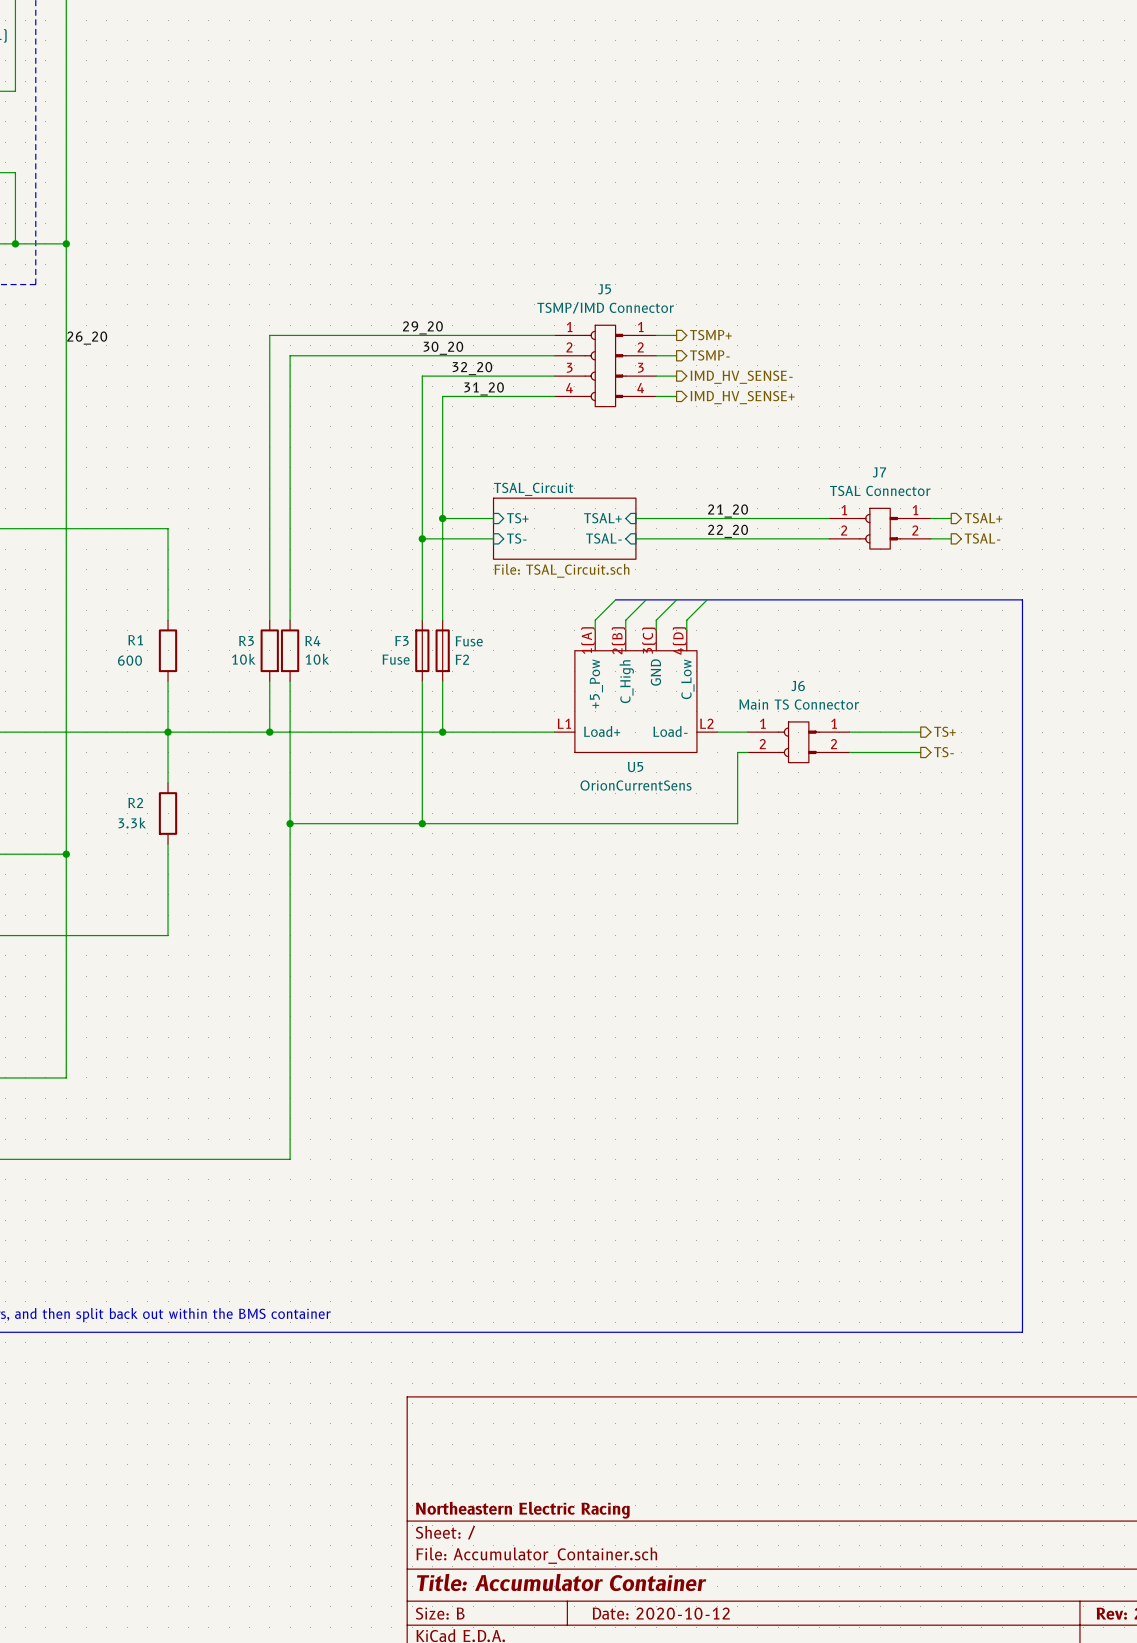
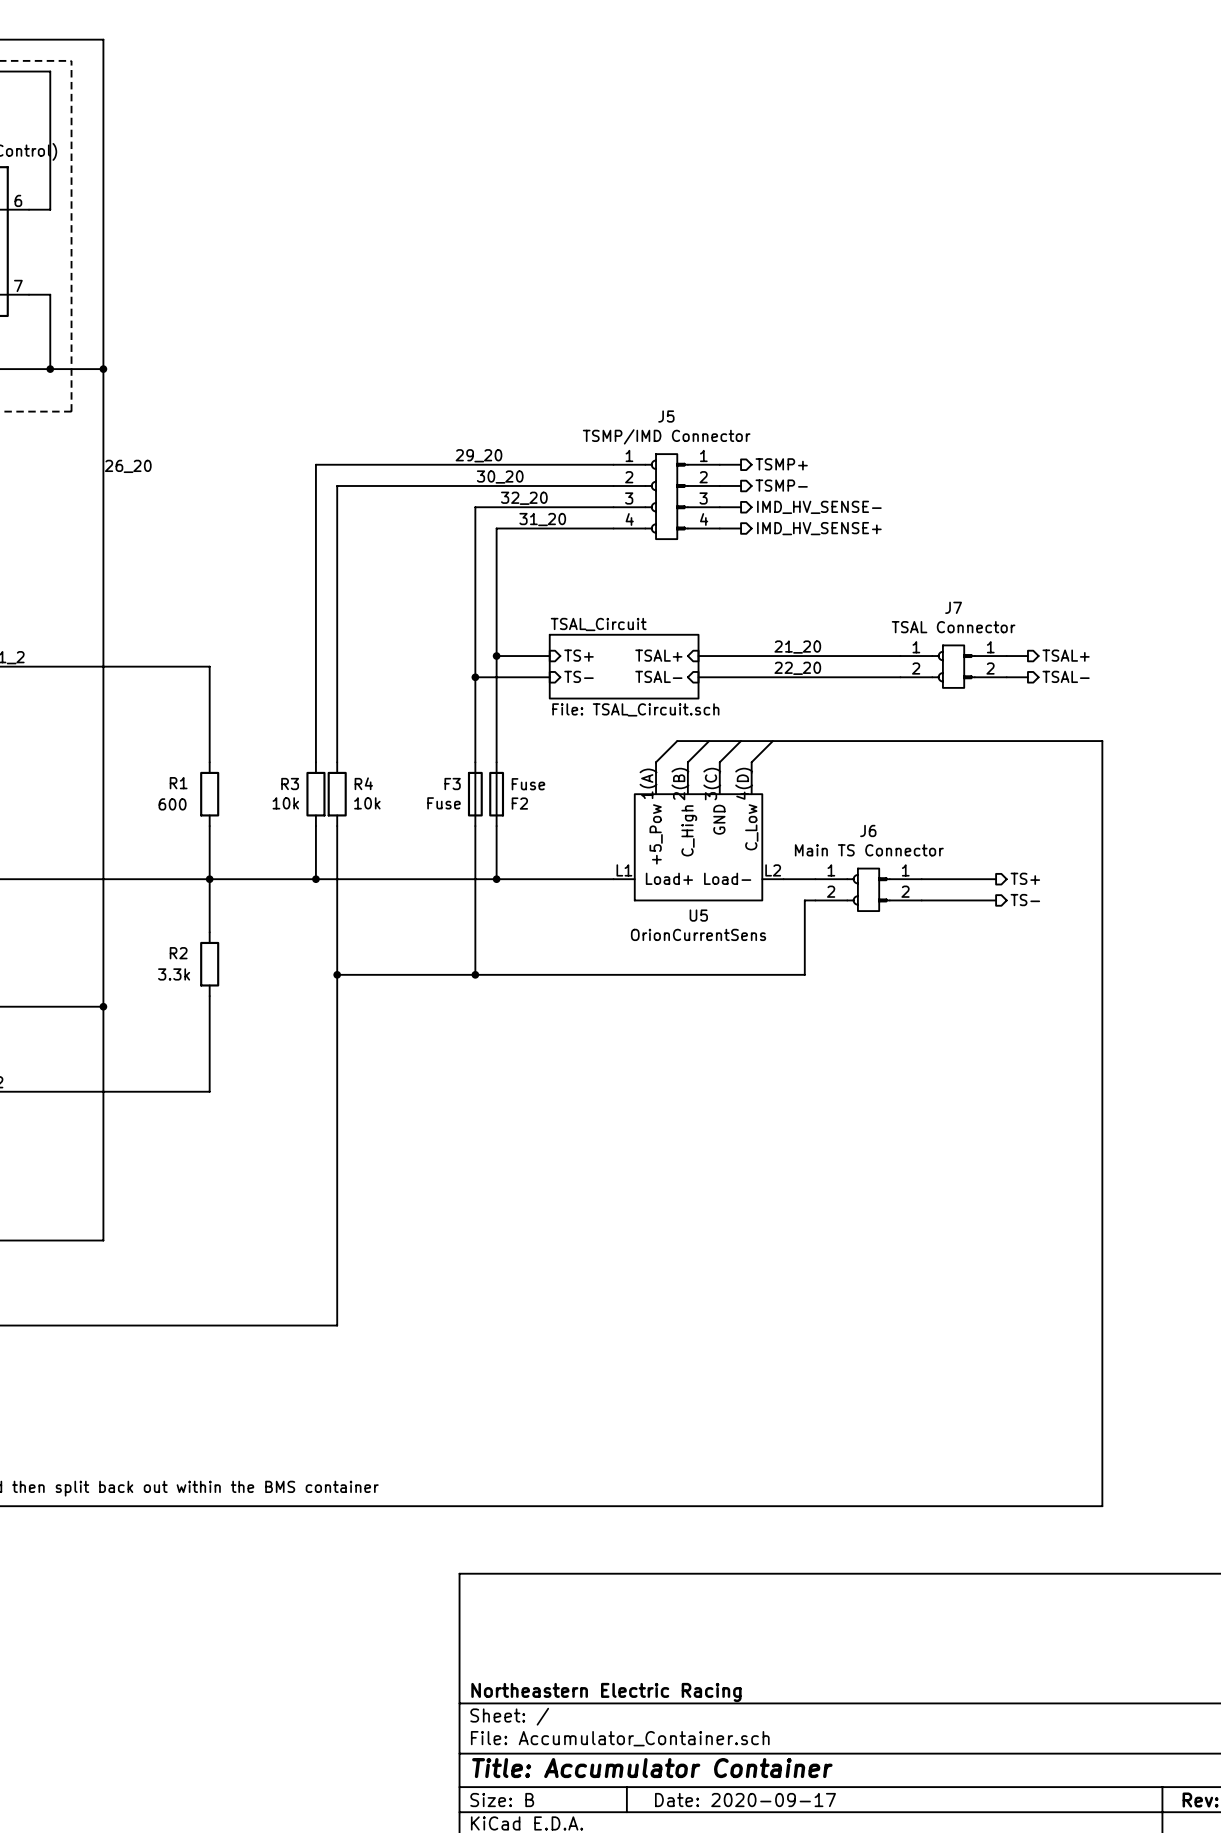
title block: Date: 2020-10-12 (661, 1613) -> Date: 2020-09-17 (745, 1800)

